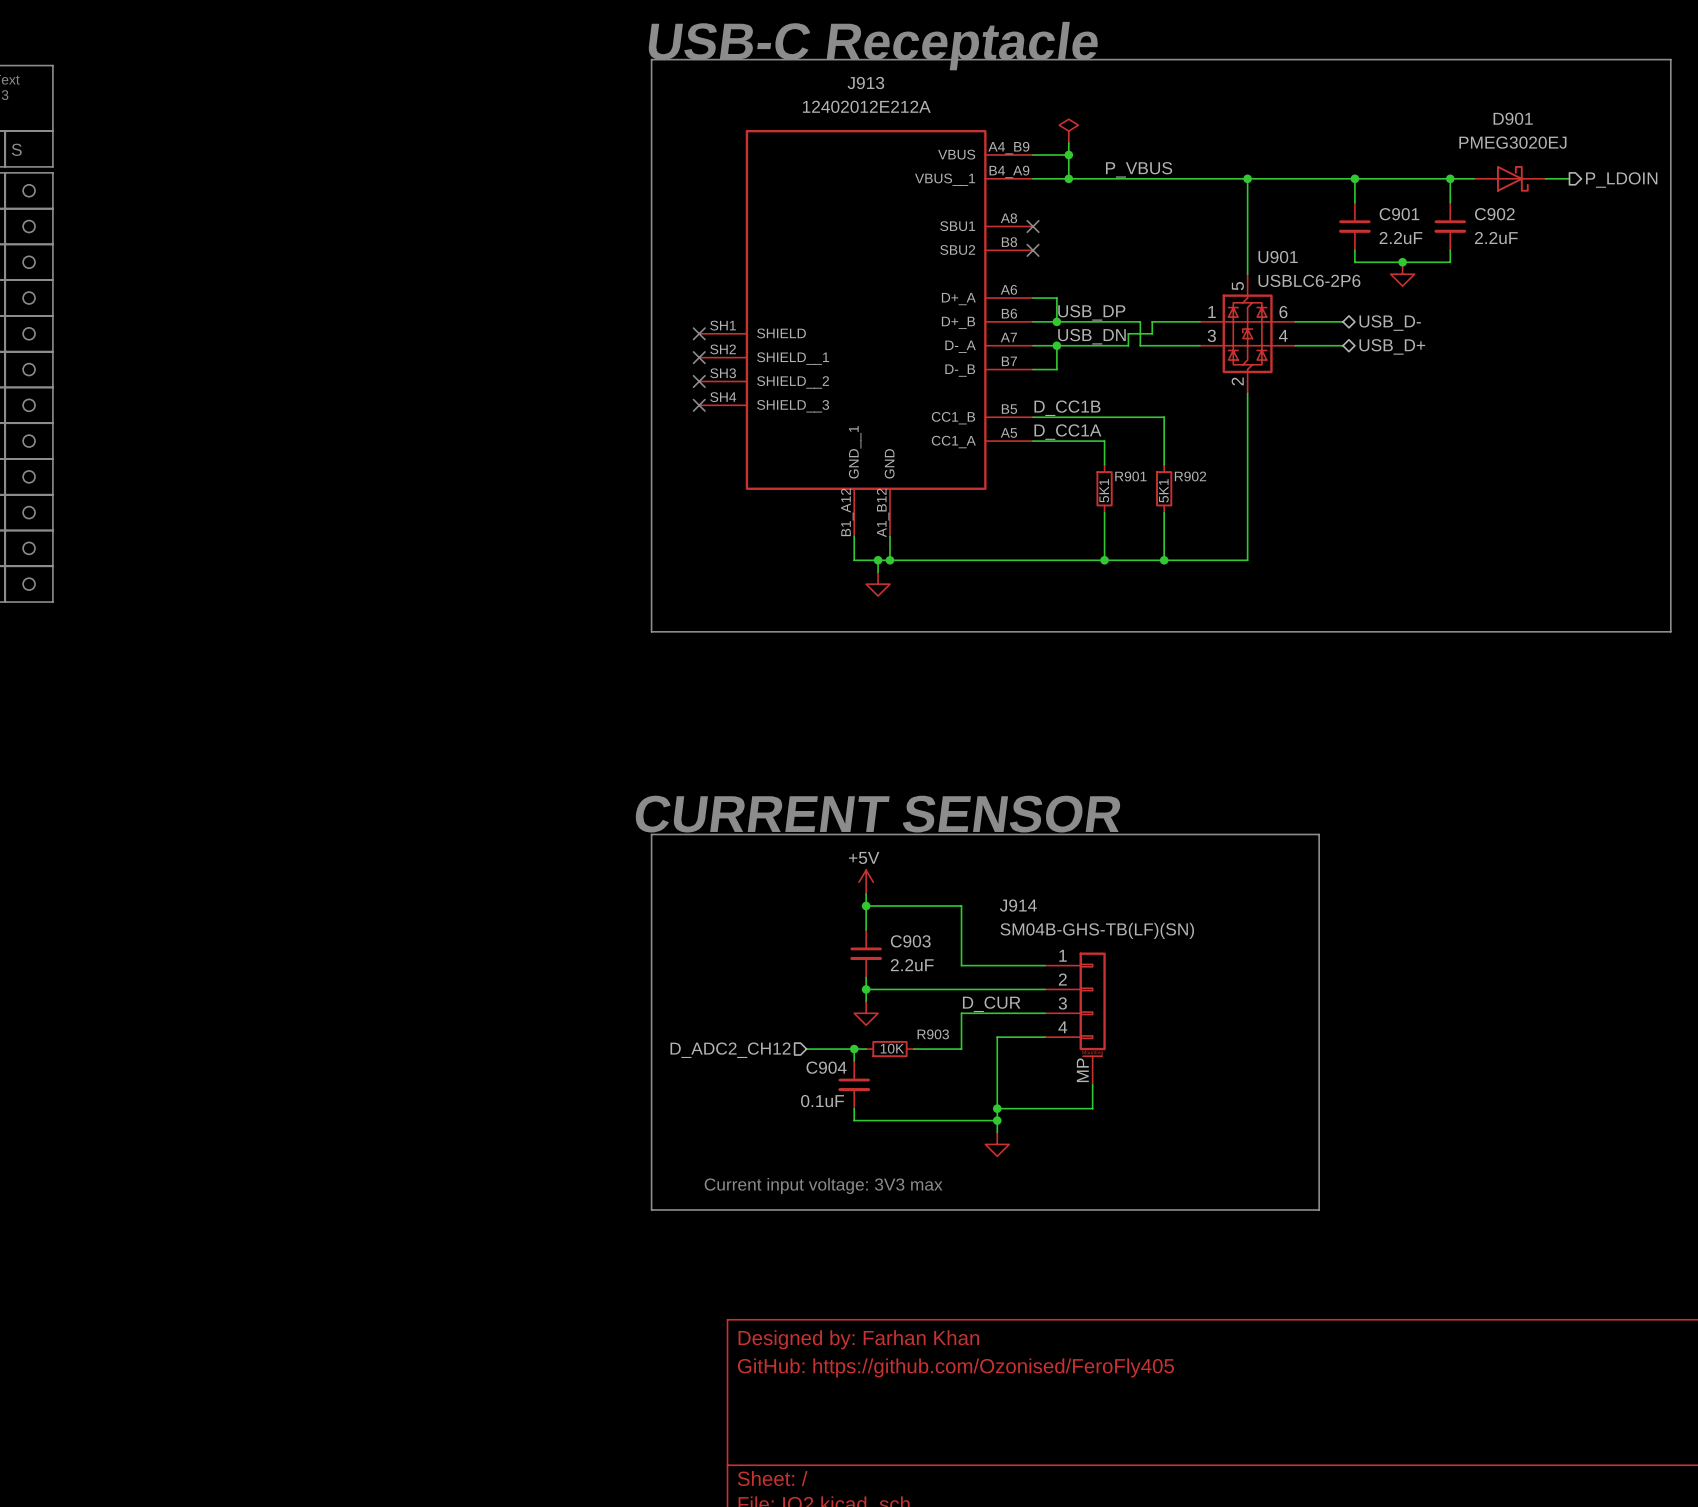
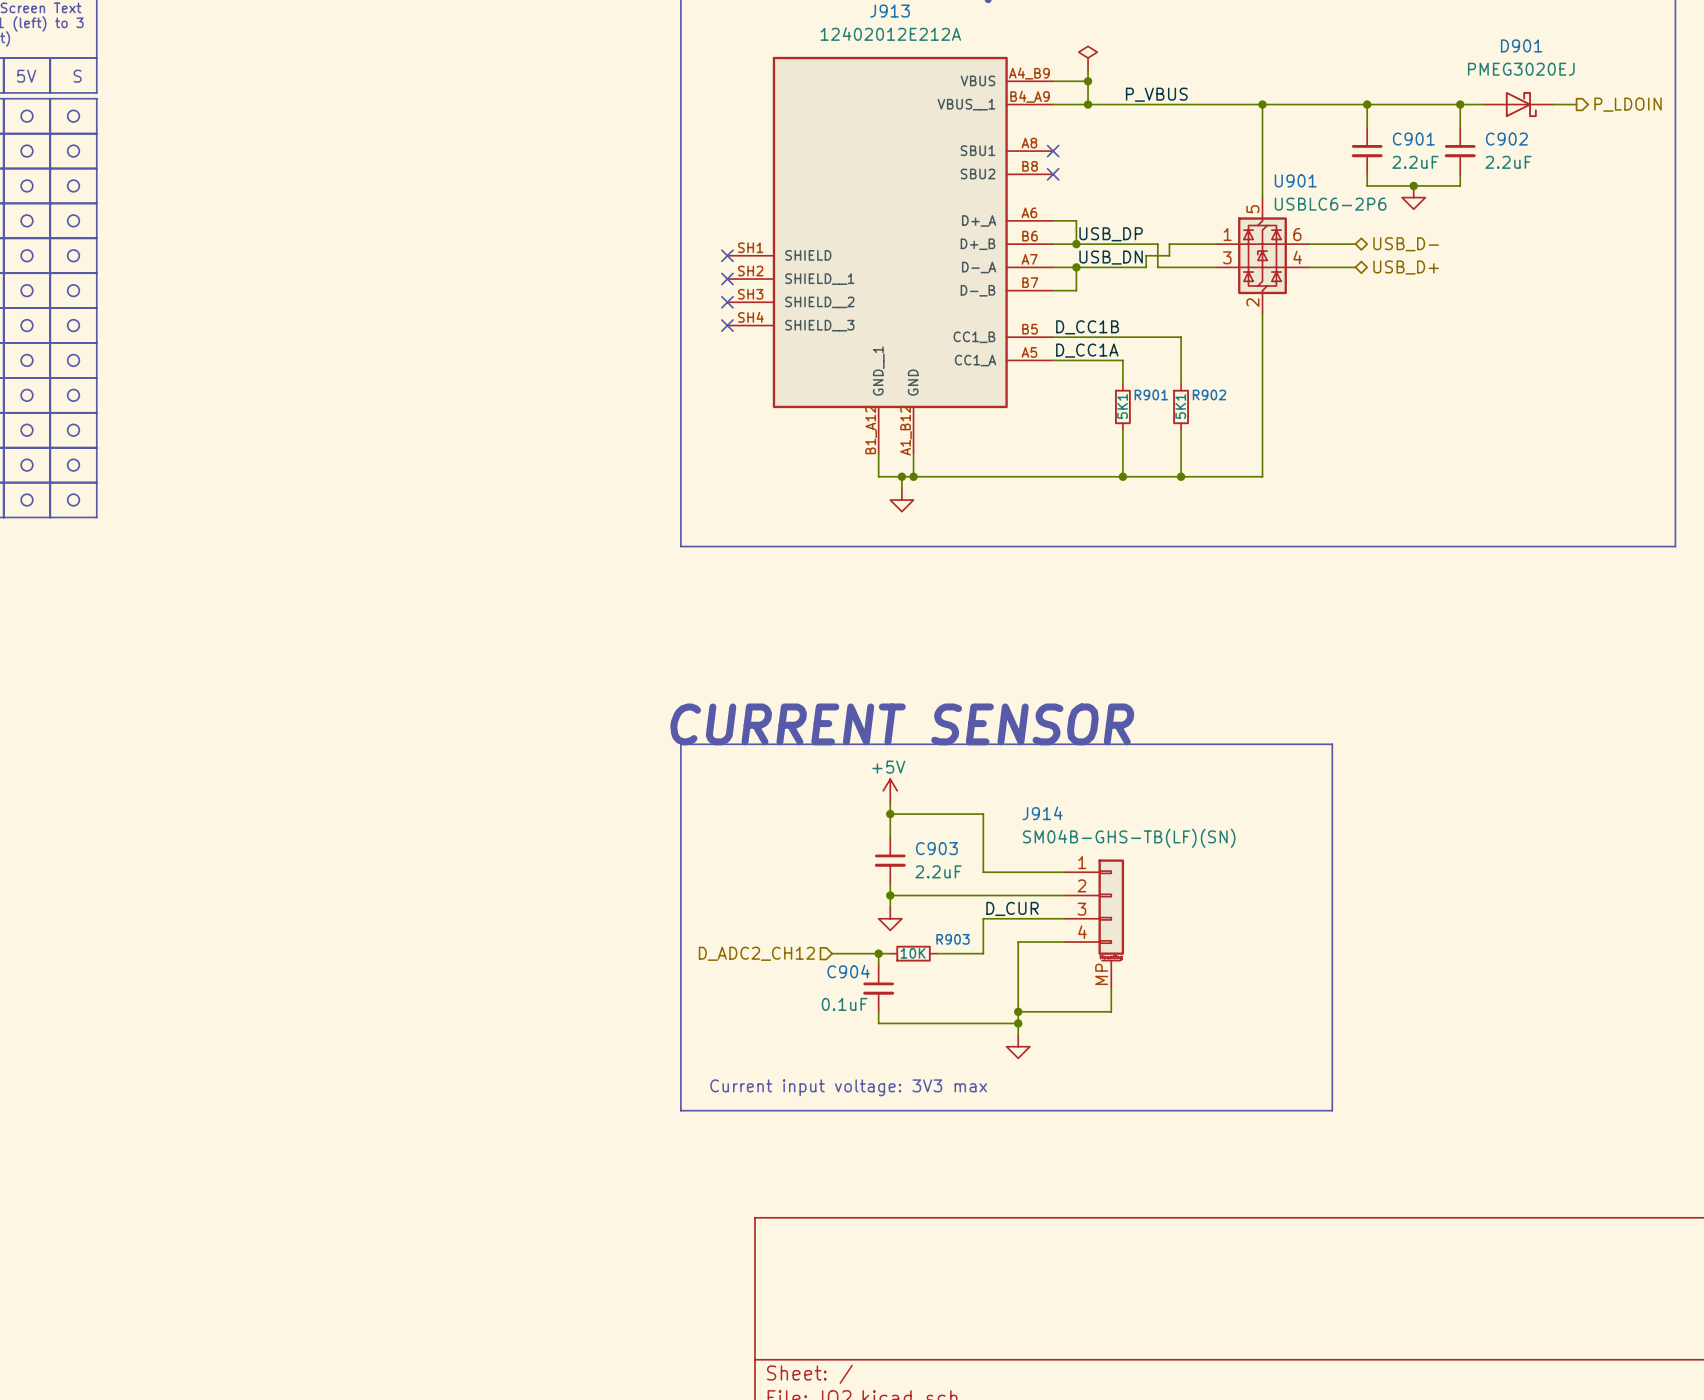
title block: Designed by: Farhan Khan (858, 1339) -> none
title block: GitHub: https://github.com/Ozonised/FeroFly405 (955, 1367) -> none

